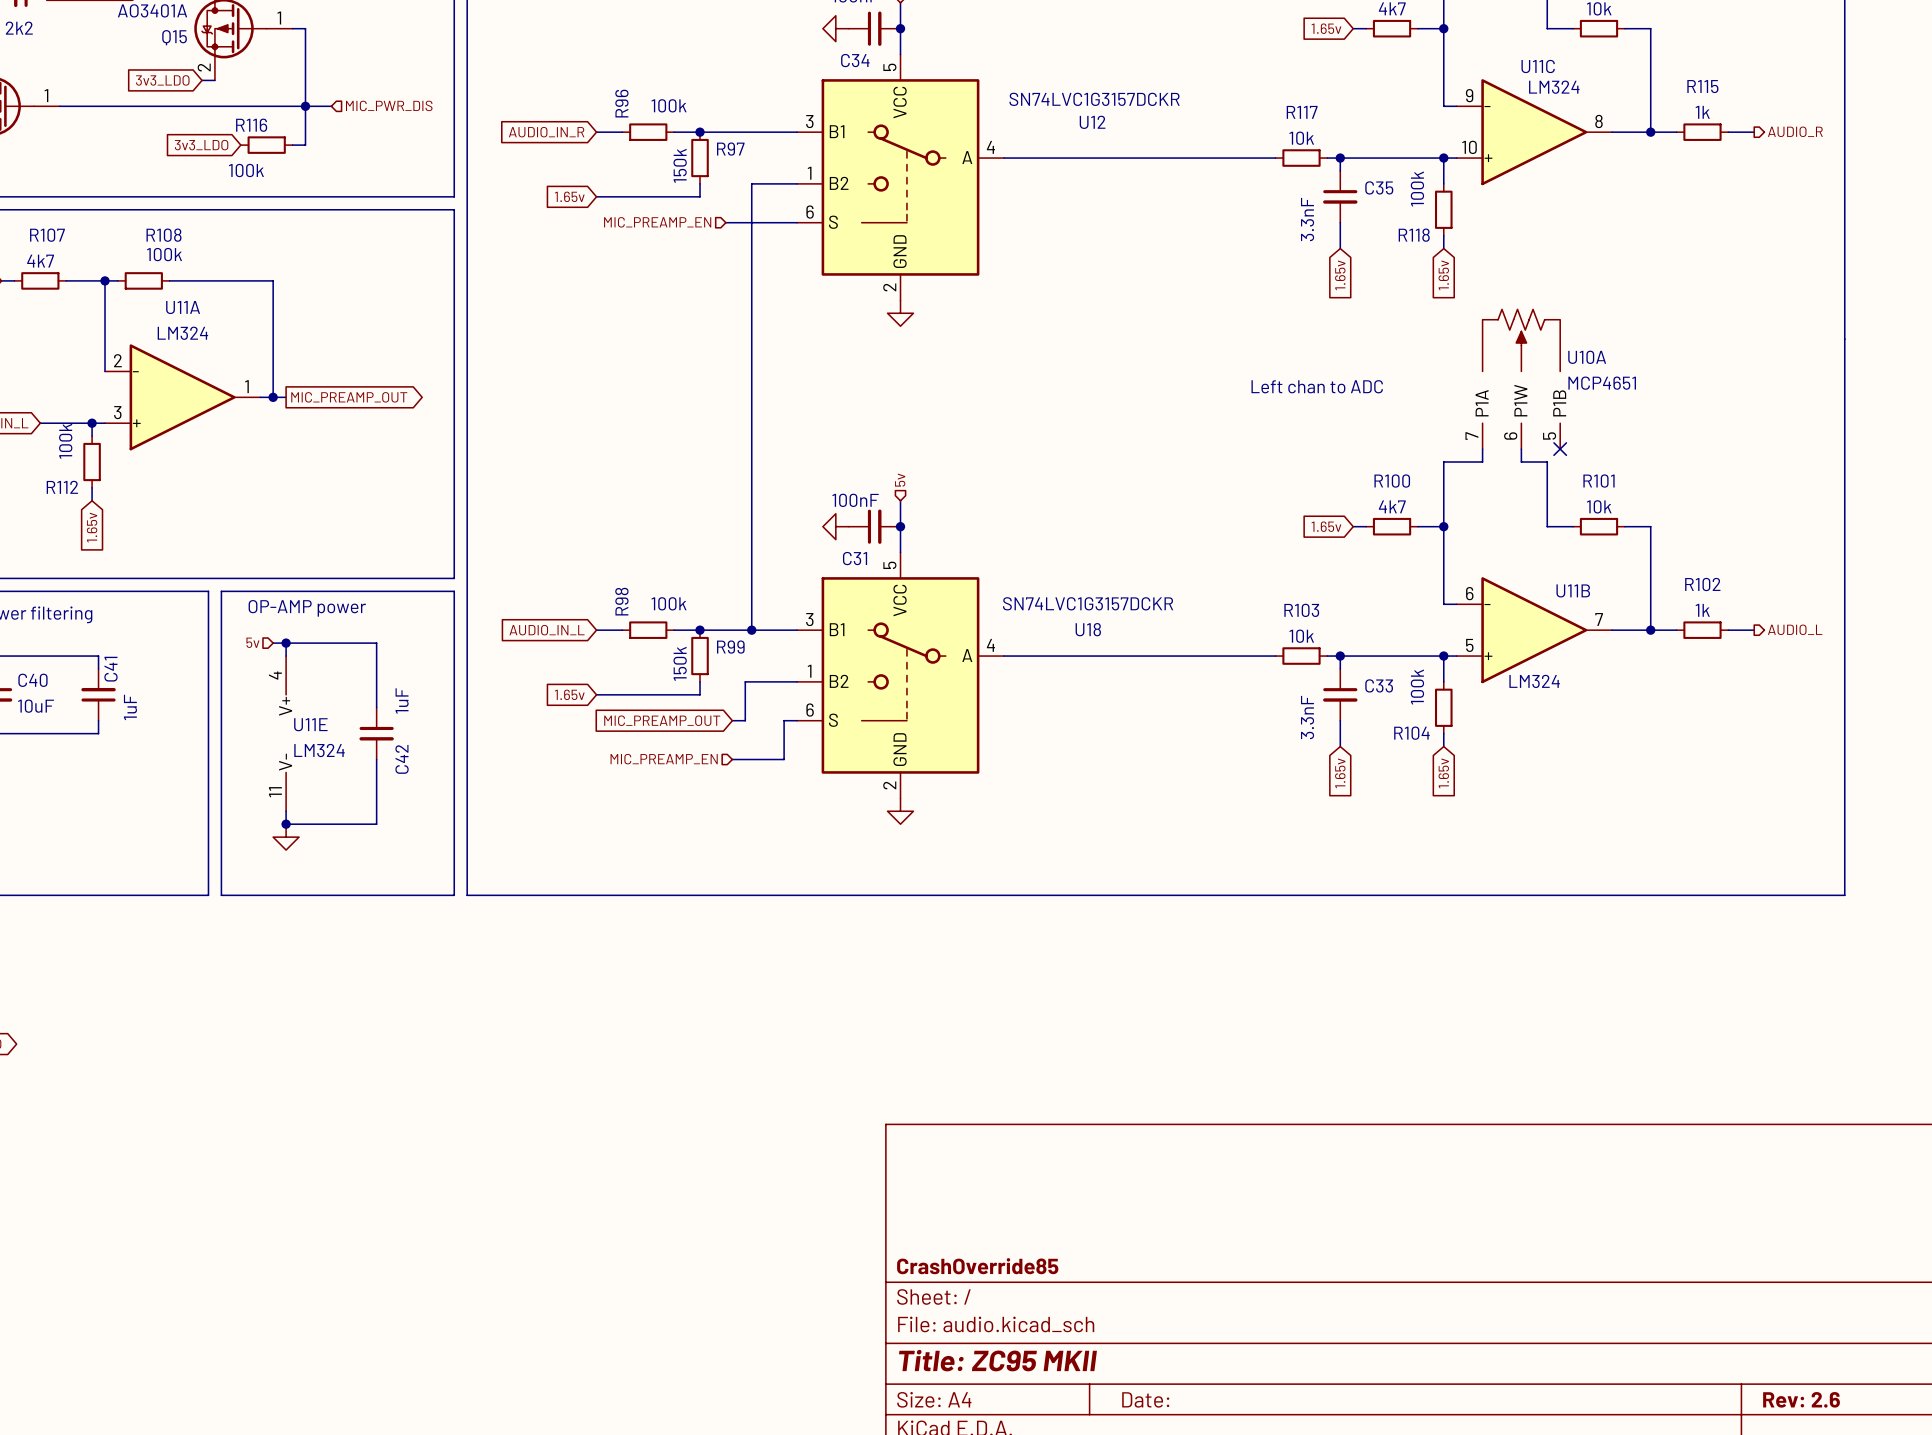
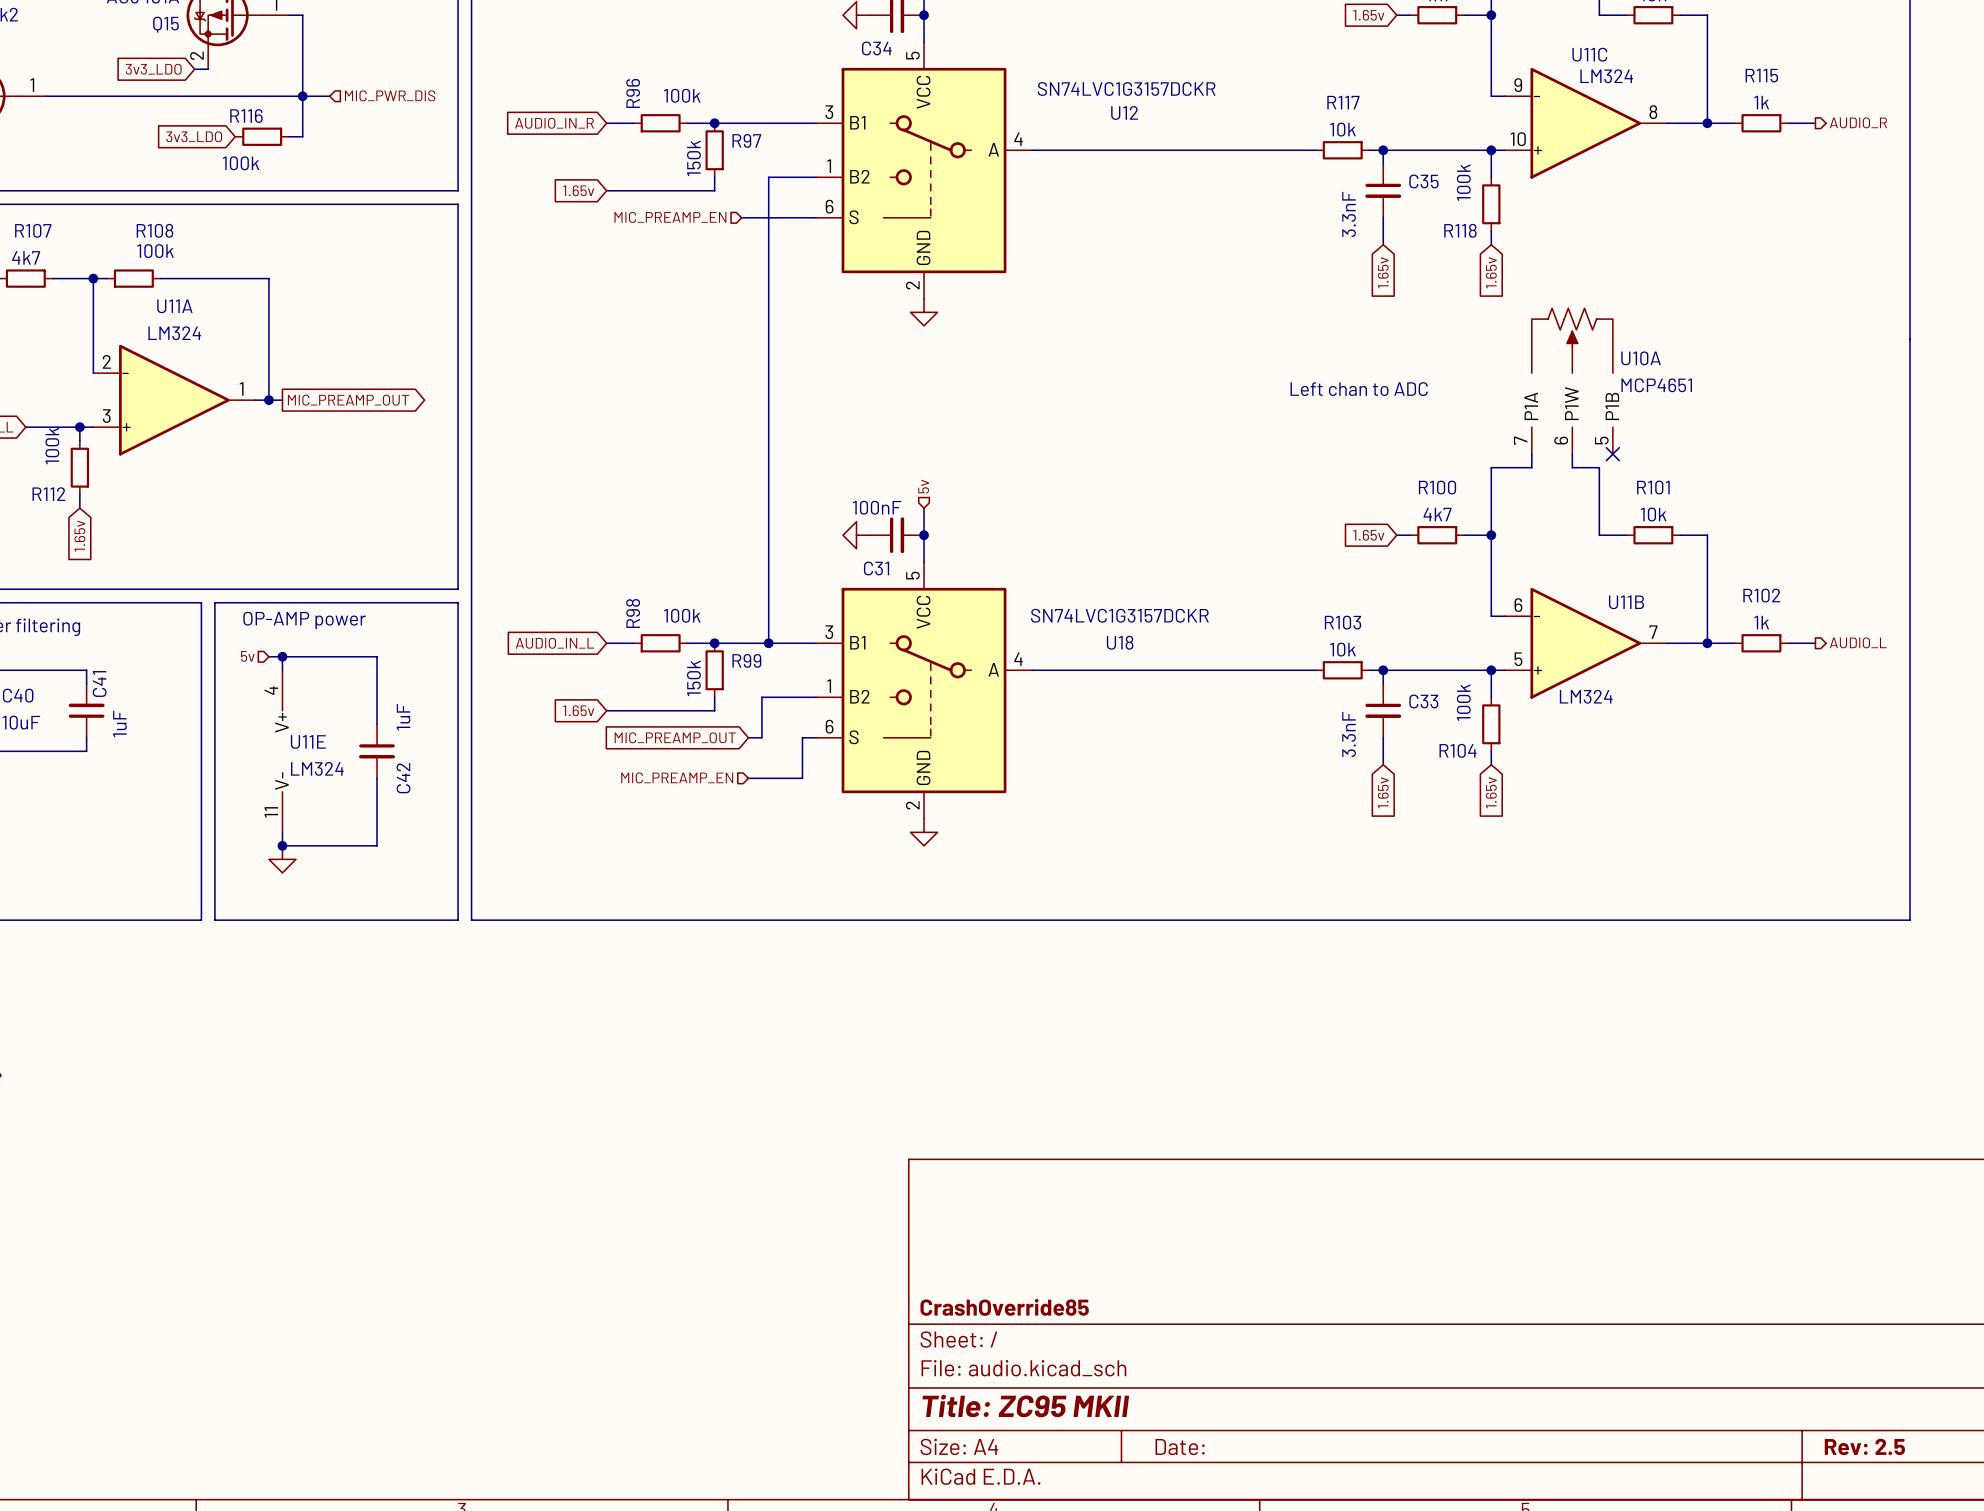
title block: Rev: 2.6 (1801, 1399) -> Rev: 2.5 (1864, 1446)

